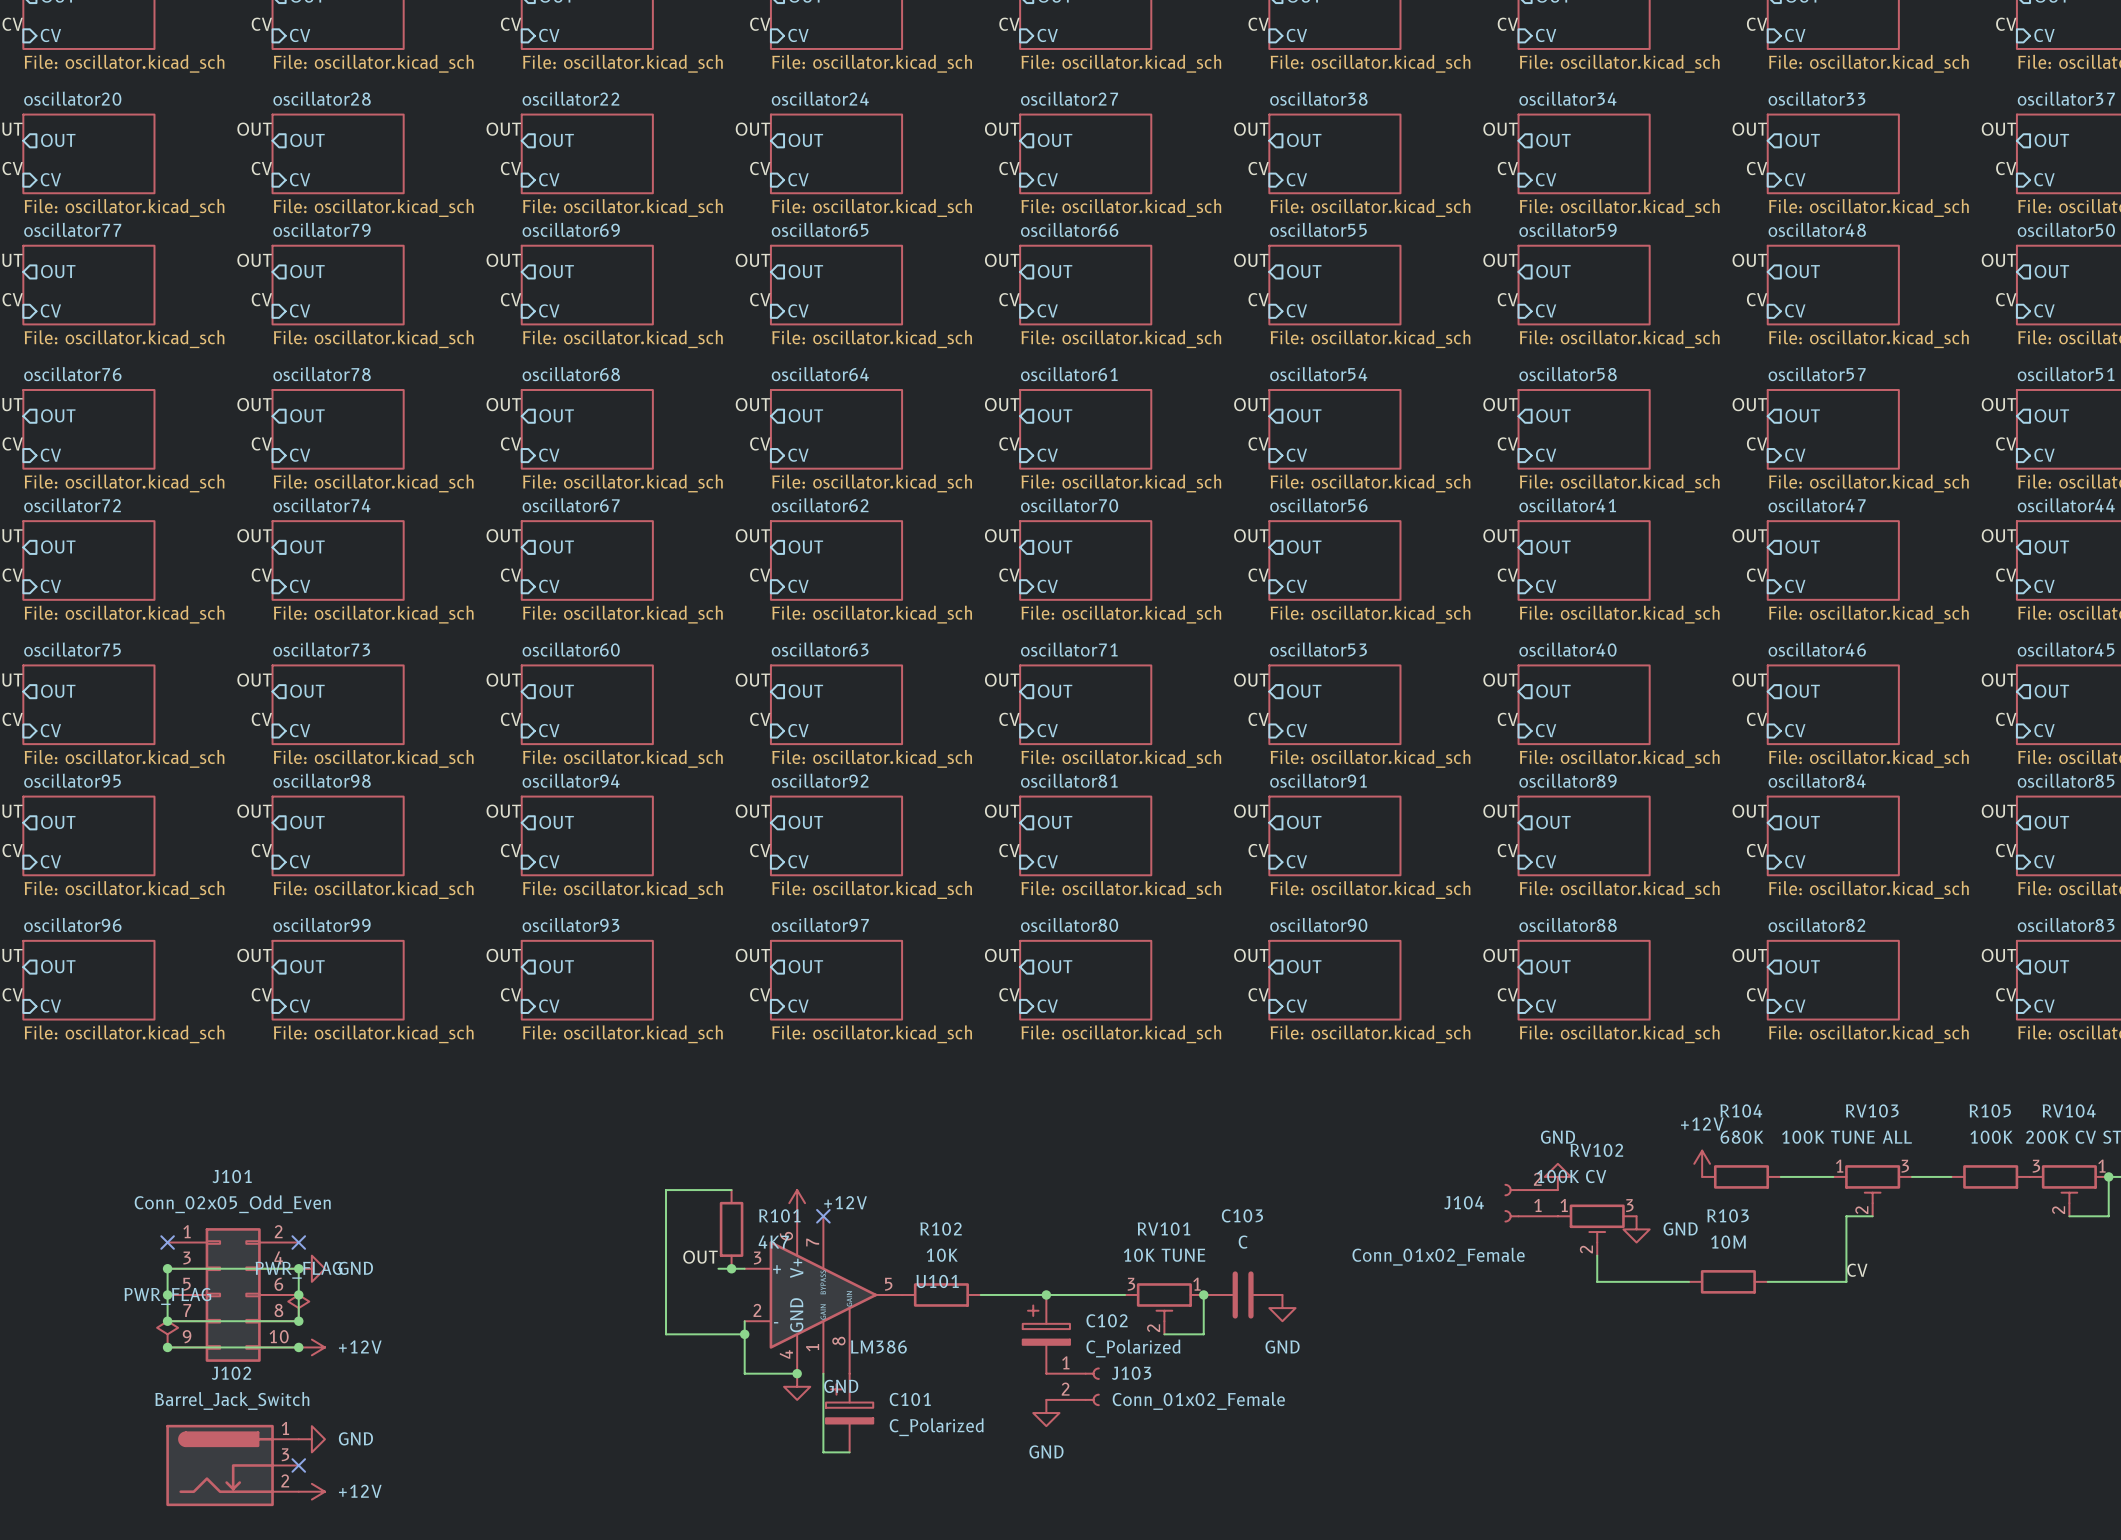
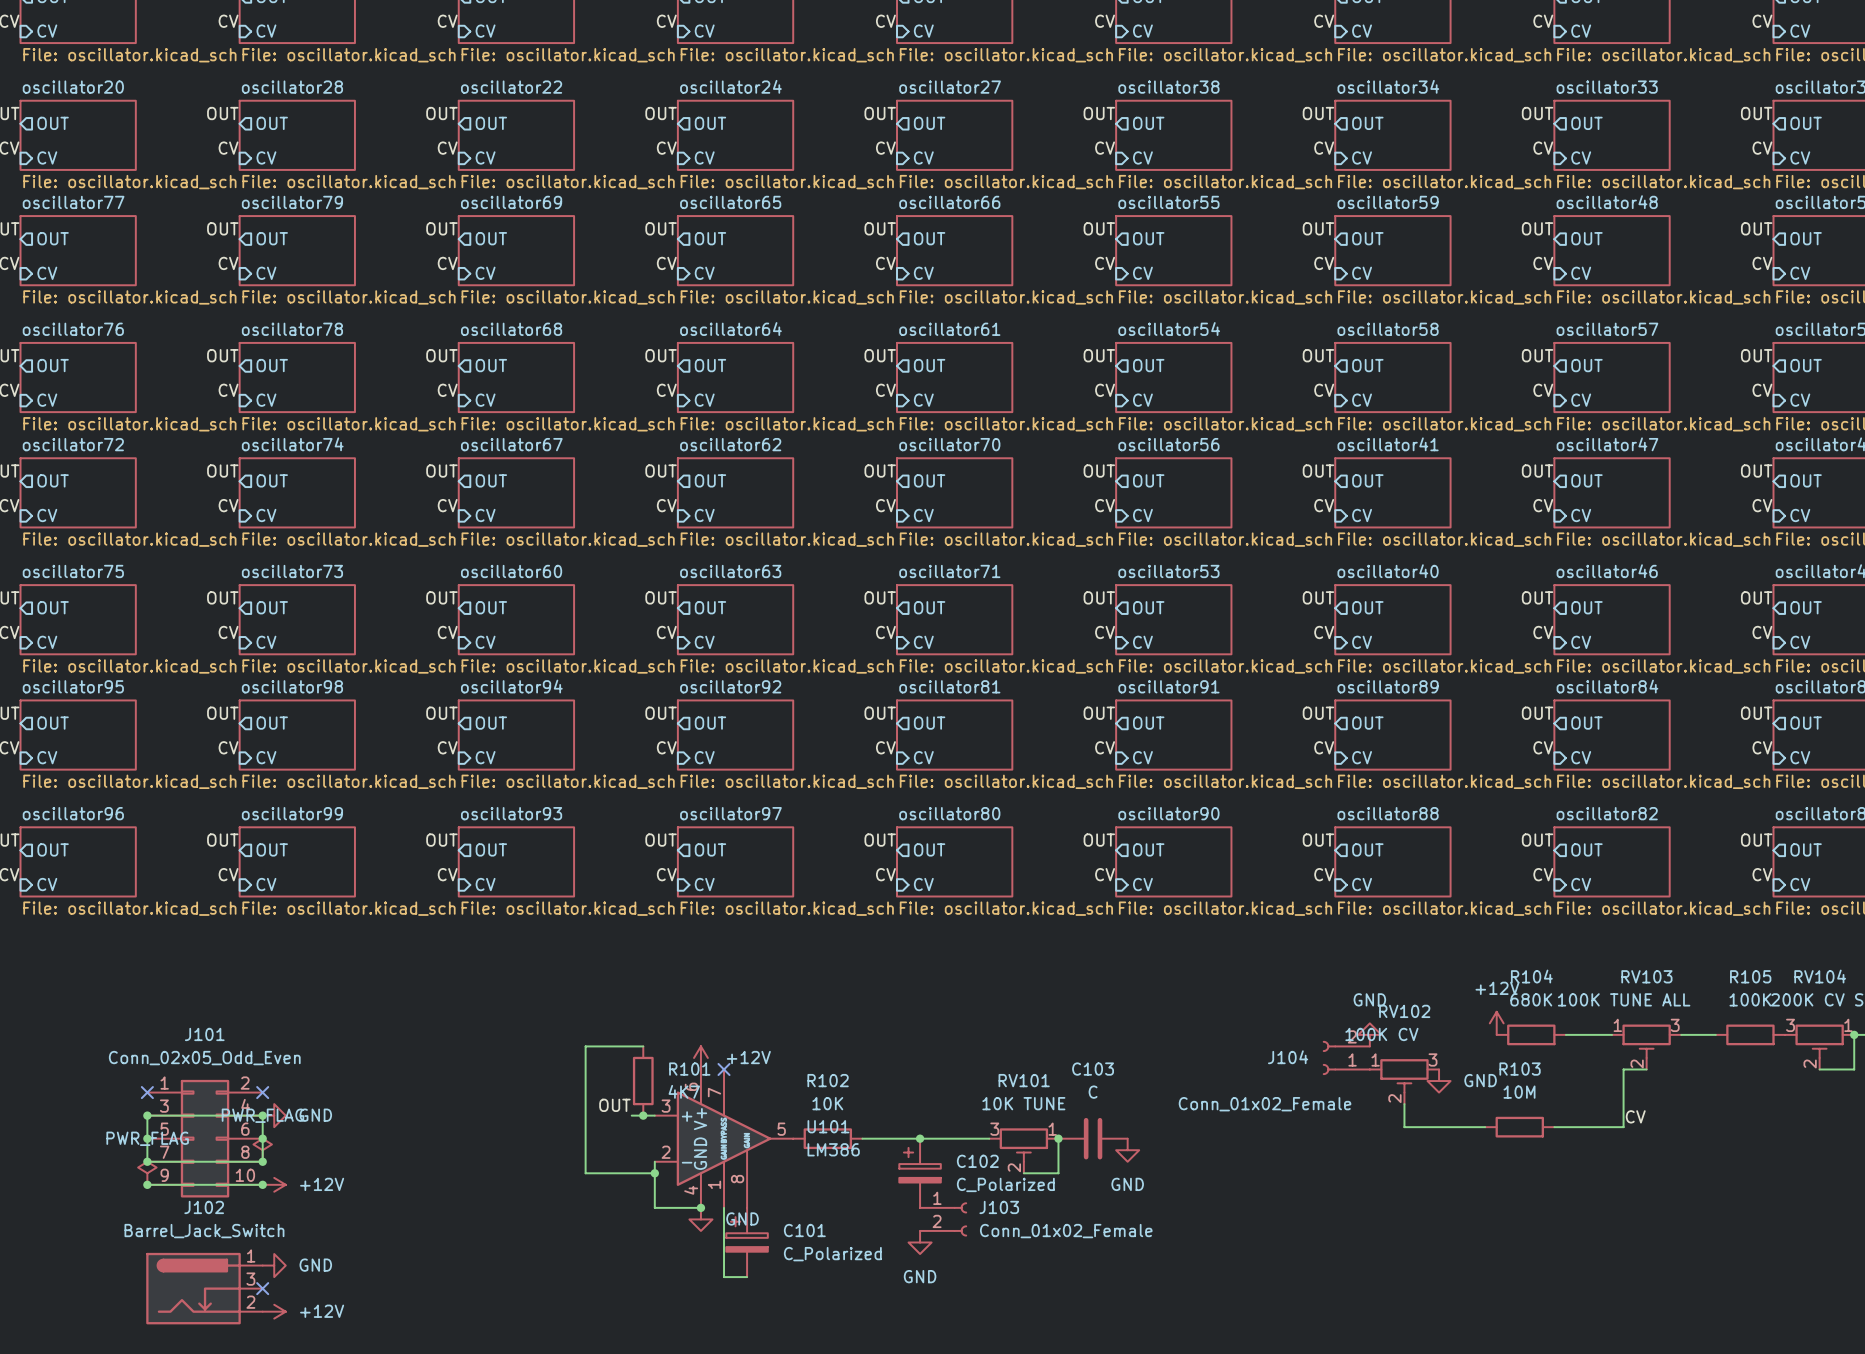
U101 value position: LM386 (878, 1347) -> LM386 (833, 1149)

